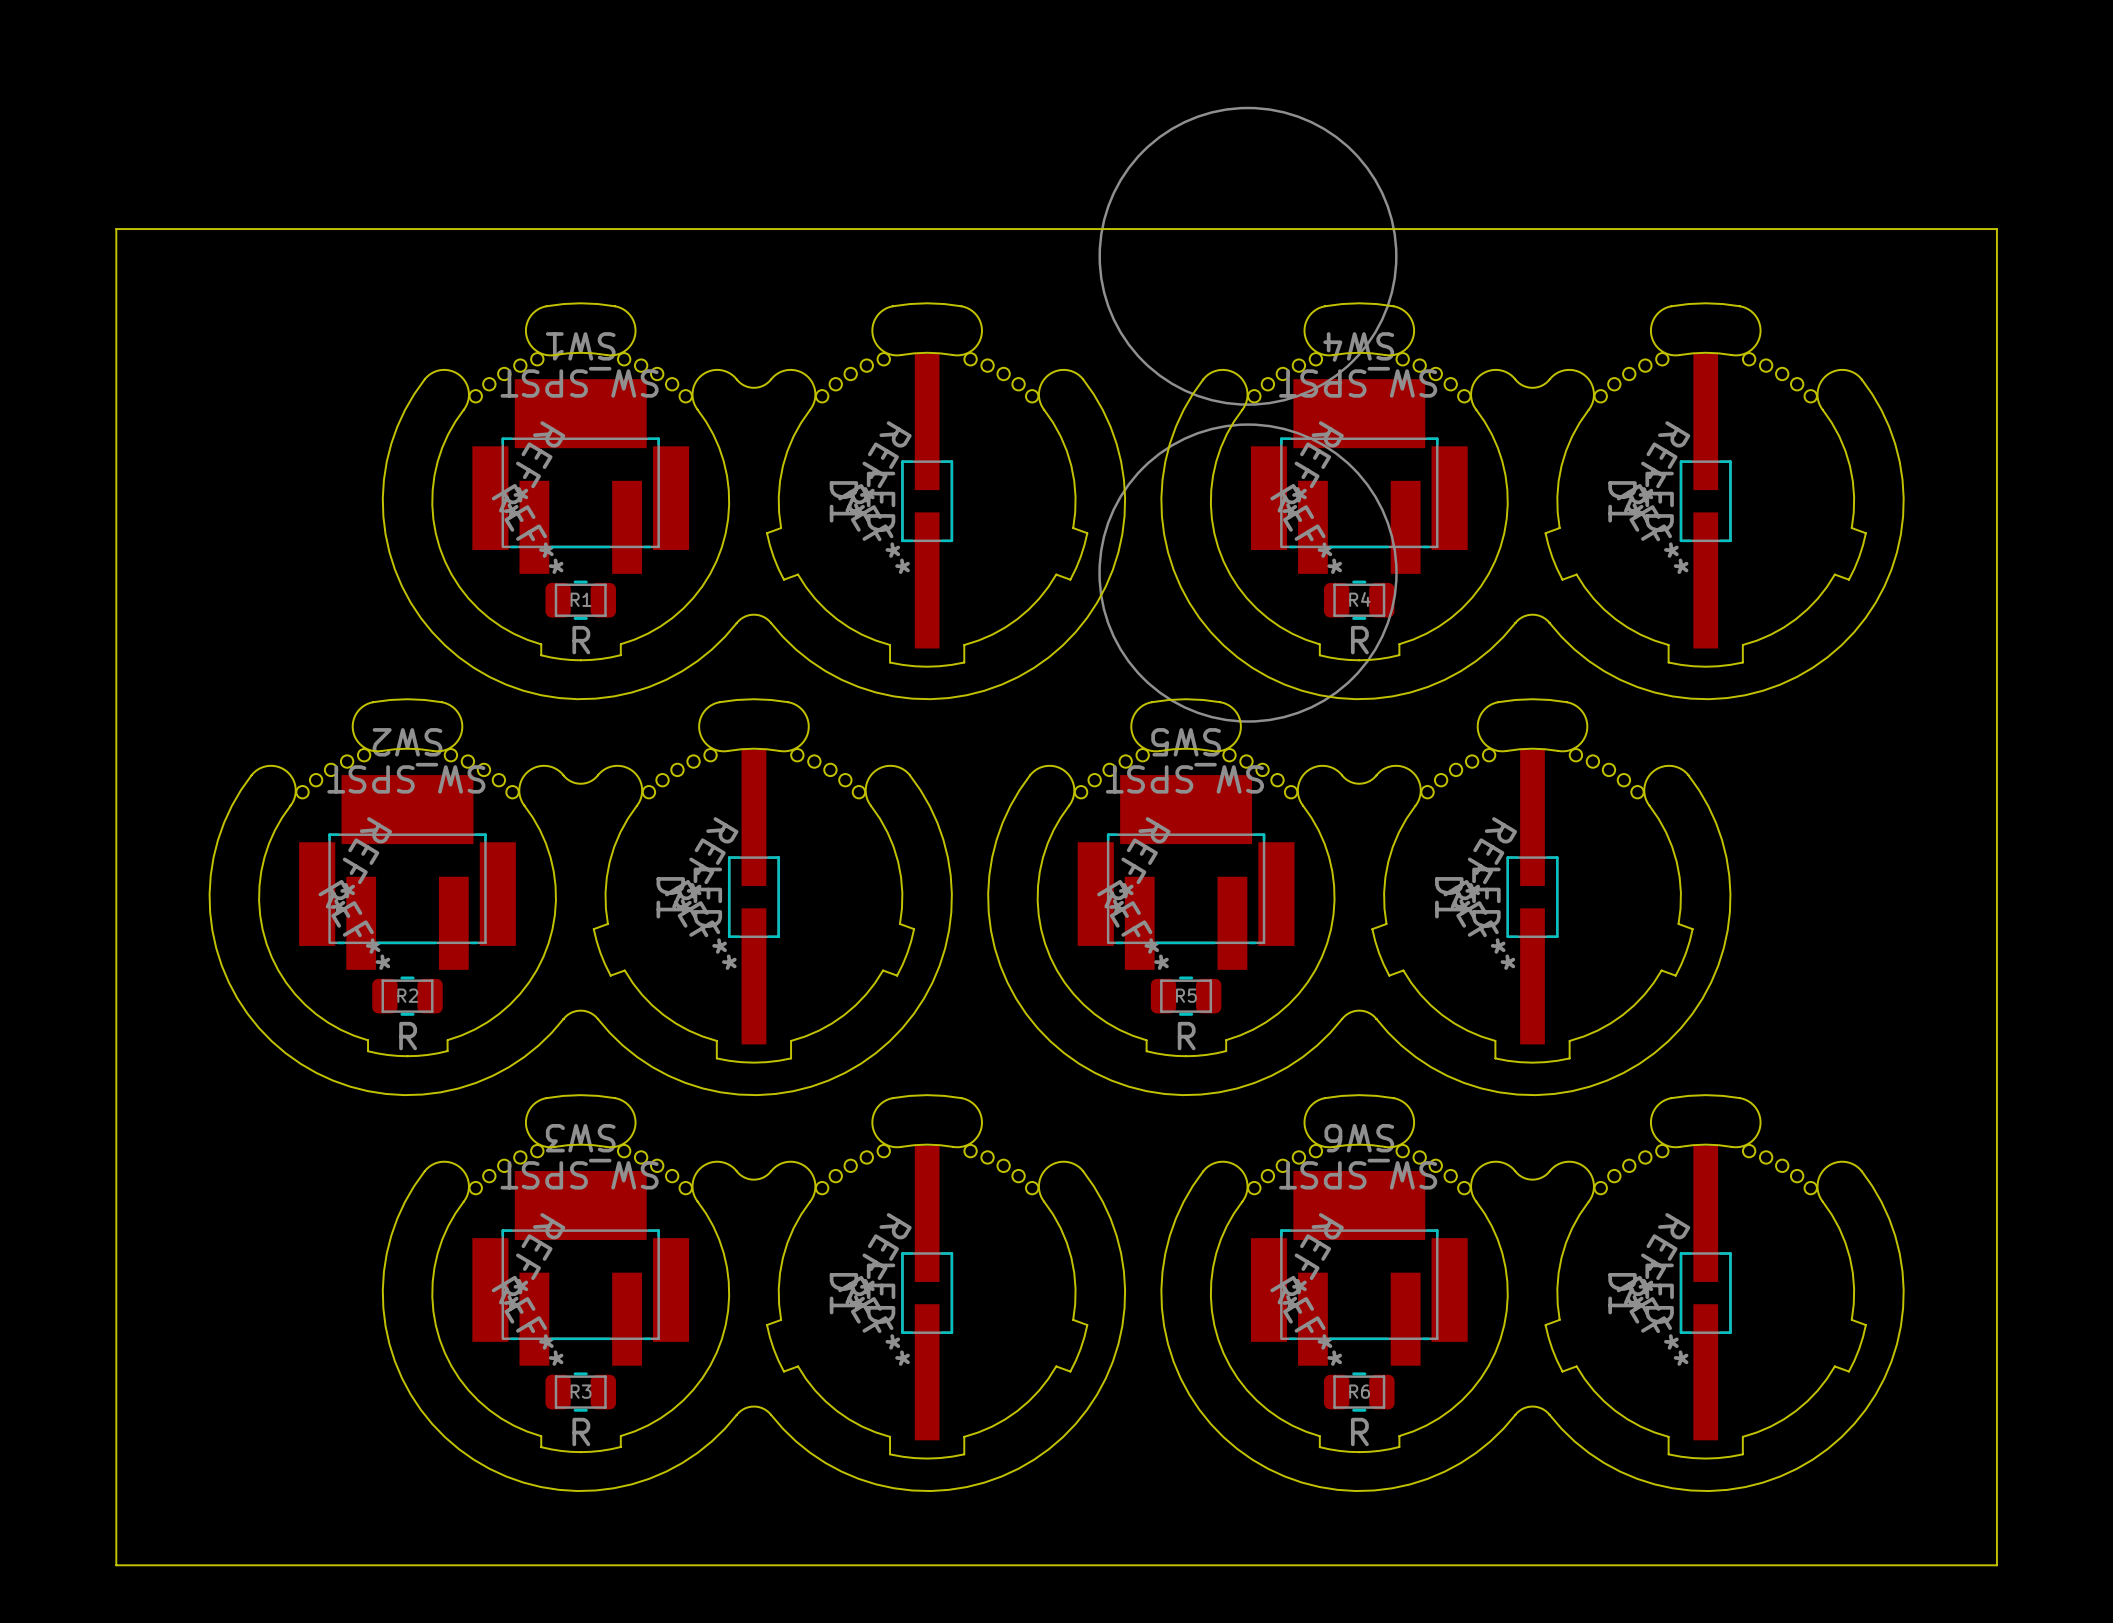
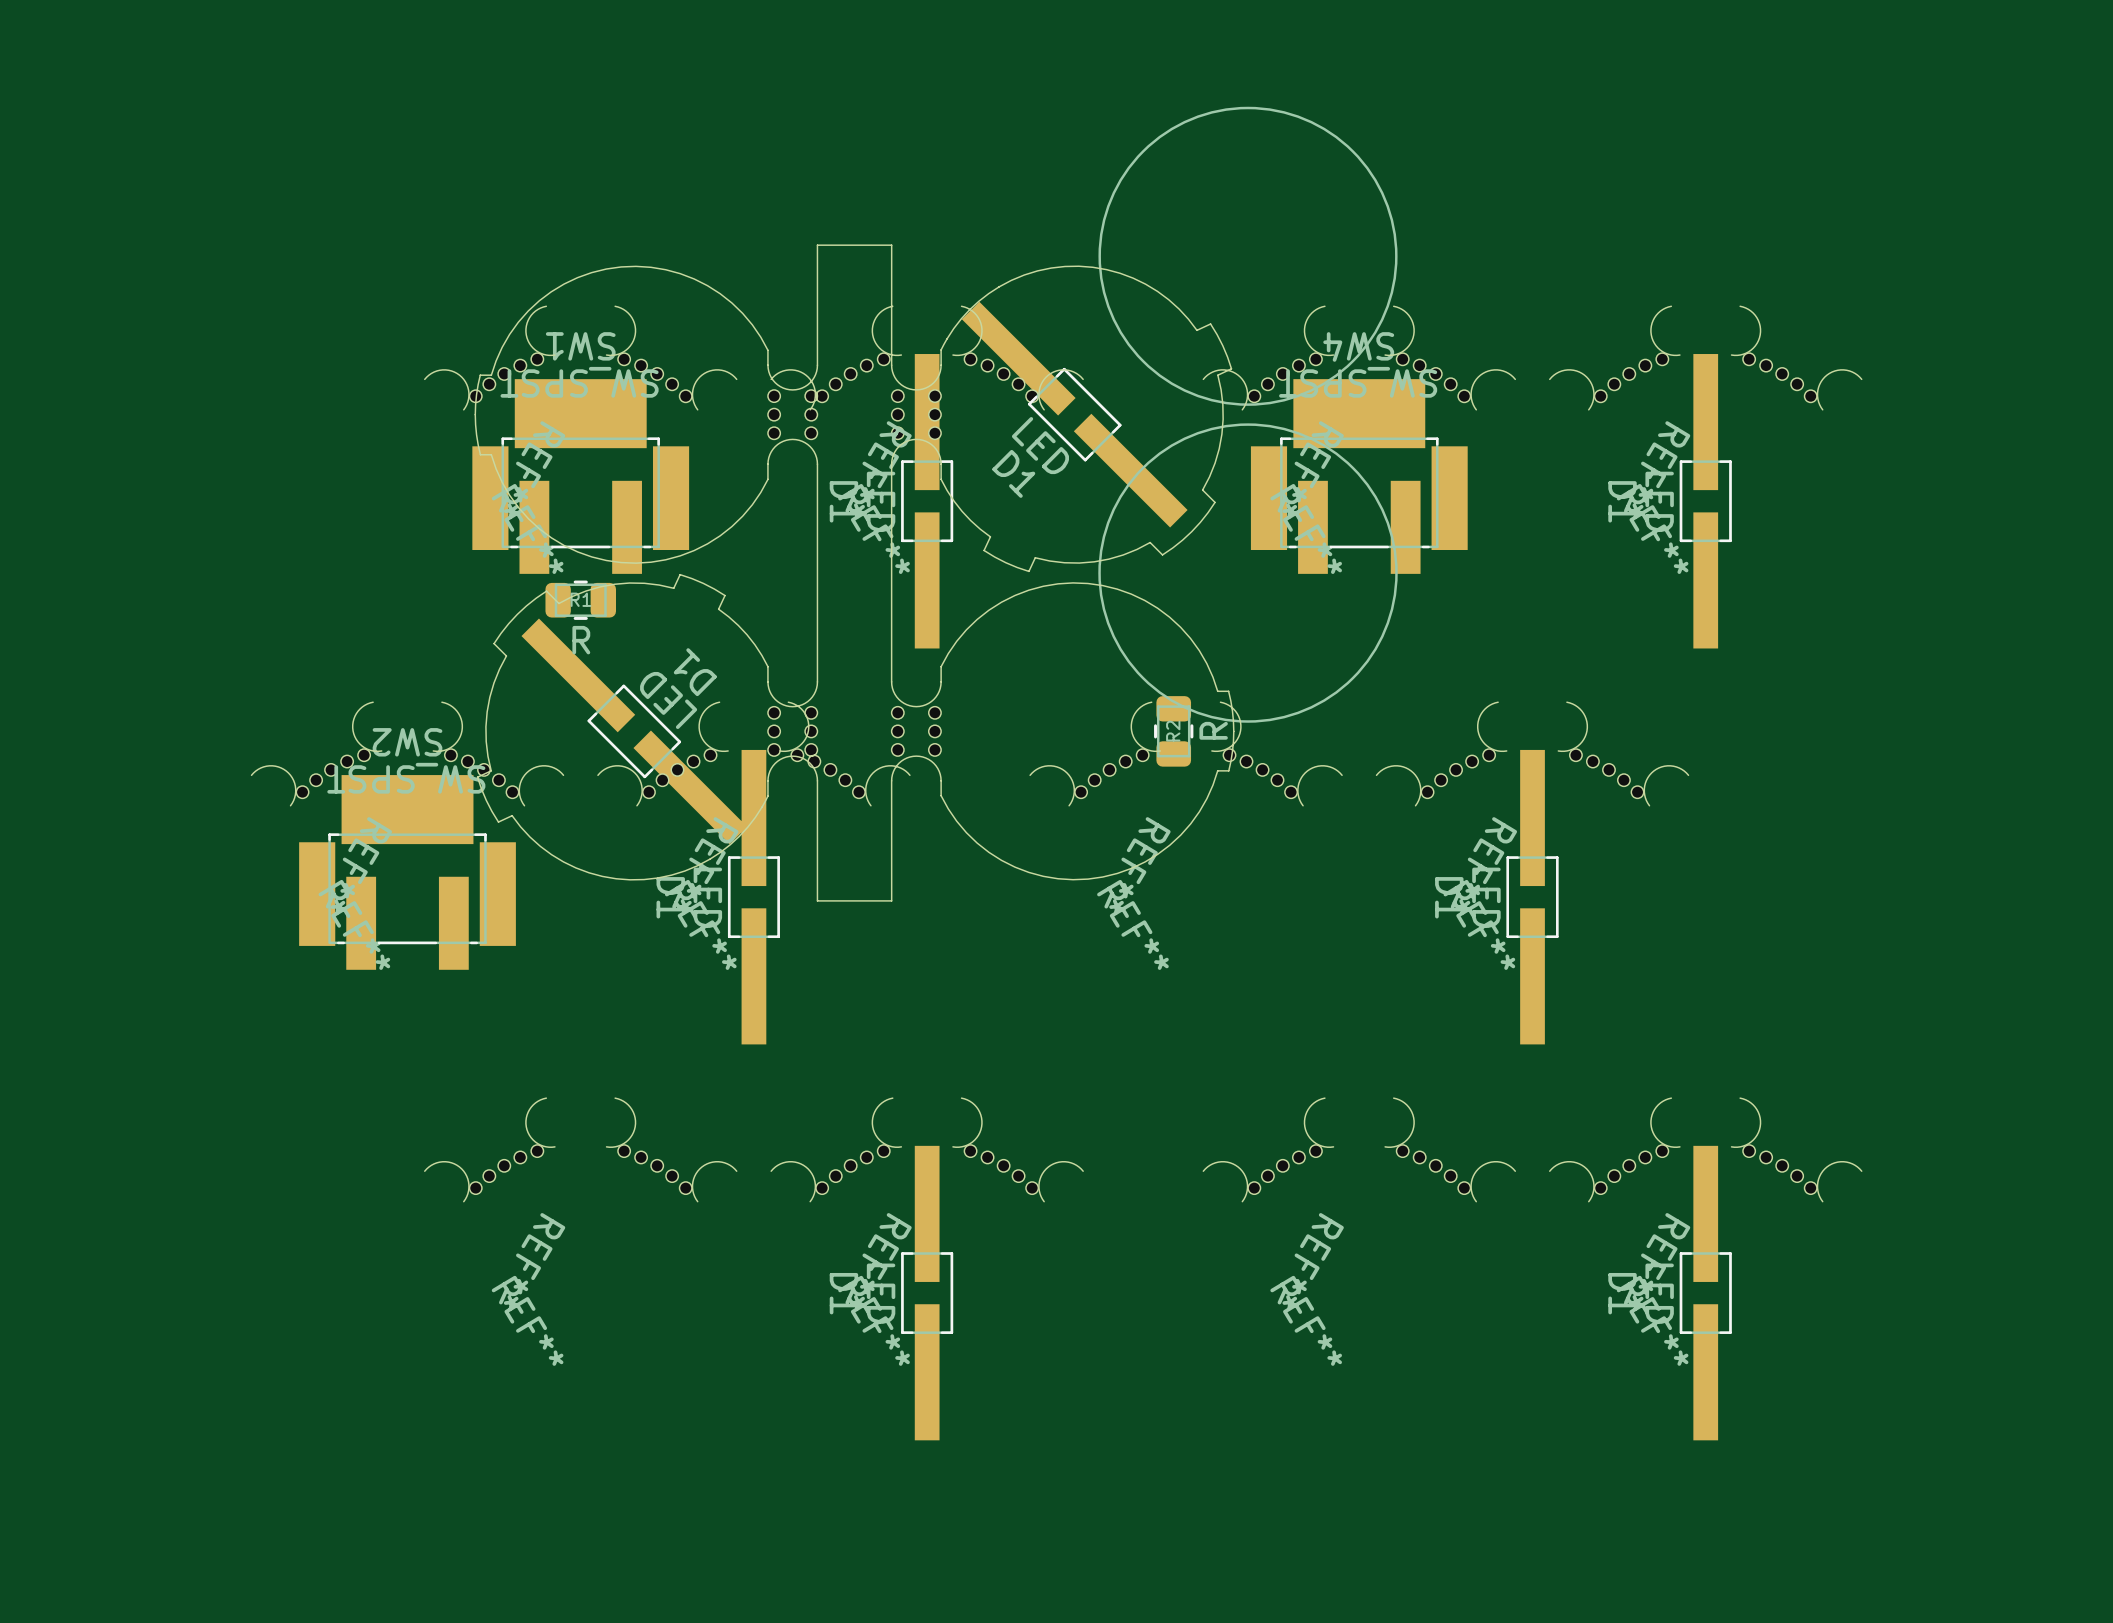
board edge: (116, 229) (1996, 229) (1996, 1565) (116, 1565) (116, 229) -> none
board edge: (546, 306) (580, 303) (615, 306) -> none
board edge: (892, 306) (927, 303) (961, 306) -> none
board edge: (1324, 306) (1359, 303) (1393, 306) -> none
board edge: (1671, 306) (1705, 303) (1740, 306) -> none
board edge: (554, 355) (580, 352) (606, 355) -> none
board edge: (901, 355) (927, 352) (952, 355) -> none
board edge: (1333, 355) (1359, 352) (1384, 355) -> none
board edge: (1680, 355) (1705, 352) (1731, 355) -> none
board edge: none -> (767, 365) (767, 350) (752, 324) (731, 302) (707, 285) (694, 278) (665, 269) (636, 266) (606, 269) (591, 272) (564, 284) (551, 291) (528, 310) (518, 322) (502, 347) (491, 375) (480, 375) (475, 414) (480, 454) (491, 454) (502, 482) (509, 495) (528, 518) (551, 537) (564, 545) (577, 551) (606, 560) (636, 563) (665, 559) (694, 550) (707, 543) (731, 526) (752, 504) (767, 479) (767, 464)
board edge: none -> (817, 365) (817, 245) (891, 245) (891, 365)
board edge: none -> (941, 365) (941, 349) (953, 328) (969, 309) (988, 293) (1011, 280) (1037, 270) (1078, 266) (1106, 269) (1145, 284) (1179, 309) (1196, 330) (1210, 323) (1222, 345) (1231, 368) (1217, 375) (1222, 404) (1221, 434) (1215, 463) (1202, 490) (1215, 502) (1191, 531) (1162, 554) (1150, 542) (1108, 559) (1079, 563) (1035, 557) (1028, 571) (1017, 567) (984, 550) (990, 536) (970, 520) (954, 501) (941, 479) (941, 464)
board edge: (424, 379) (405, 410) (391, 443) (386, 461) (382, 498) (385, 534) (395, 569) (410, 602) (420, 617) (445, 645) (473, 667) (506, 684) (541, 695) (577, 699) (613, 696) (649, 686) (682, 671) (711, 649) (740, 619) (748, 615) (756, 614) (767, 619) (783, 636) (810, 661) (841, 679) (858, 686) (893, 696) (930, 699) (966, 695) (984, 690) (1018, 677) (1034, 667) (1062, 645) (1075, 632) (1097, 602) (1105, 586) (1112, 569) (1122, 534) (1124, 516) (1123, 479) (1121, 461) (1110, 426) (1102, 410) (1083, 379) -> none
board edge: (736, 379) (745, 386) (753, 387) (762, 386) (771, 379) -> none
board edge: (1203, 379) (1183, 410) (1169, 443) (1162, 479) (1161, 516) (1164, 534) (1173, 569) (1189, 602) (1199, 617) (1223, 645) (1252, 667) (1284, 684) (1319, 695) (1356, 699) (1392, 696) (1427, 686) (1460, 671) (1490, 649) (1519, 619) (1526, 615) (1535, 614) (1545, 619) (1561, 636) (1588, 661) (1620, 679) (1637, 686) (1672, 696) (1708, 699) (1745, 695) (1762, 690) (1780, 684) (1812, 667) (1841, 645) (1854, 632) (1875, 602) (1884, 586) (1897, 552) (1900, 534) (1903, 516) (1902, 479) (1899, 461) (1889, 426) (1881, 410) (1861, 379) -> none
board edge: (1515, 379) (1521, 384) (1532, 387) (1543, 384) (1549, 379) -> none
board edge: (463, 409) (448, 434) (434, 475) (433, 519) (445, 561) (459, 586) (489, 618) (514, 633) (541, 644) (541, 655) (580, 660) (620, 655) (620, 644) (647, 633) (672, 618) (702, 586) (716, 561) (728, 519) (728, 490) (719, 447) (697, 409) -> none
board edge: (1044, 409) (1060, 436) (1071, 465) (1075, 496) (1073, 528) (1087, 533) (1075, 568) (1070, 579) (1056, 574) (1039, 598) (1005, 627) (964, 645) (964, 662) (927, 666) (890, 662) (890, 645) (849, 627) (825, 609) (798, 574) (783, 579) (778, 568) (767, 533) (781, 528) (778, 496) (782, 465) (793, 436) (810, 410) -> none
board edge: (1242, 409) (1220, 447) (1211, 490) (1214, 533) (1223, 561) (1237, 586) (1268, 618) (1292, 633) (1319, 644) (1319, 655) (1359, 660) (1399, 655) (1399, 644) (1426, 633) (1451, 618) (1472, 597) (1495, 561) (1504, 533) (1507, 490) (1497, 447) (1476, 409) -> none
board edge: (1822, 409) (1839, 436) (1849, 465) (1854, 496) (1851, 528) (1865, 533) (1854, 568) (1848, 579) (1834, 574) (1807, 609) (1783, 627) (1742, 645) (1742, 662) (1705, 666) (1668, 662) (1668, 645) (1627, 627) (1604, 609) (1576, 574) (1562, 579) (1556, 568) (1545, 533) (1559, 528) (1557, 496) (1561, 465) (1572, 436) (1588, 410) -> none
part: none -> (792, 414)
part: none -> (916, 414)
D1: none -> LED (1074, 414)
board edge: none -> (817, 464) (817, 681)
board edge: none -> (891, 464) (891, 681)
R4: R (1359, 600) -> none
board edge: none -> (767, 681) (767, 666) (754, 644) (738, 625) (718, 609) (724, 595) (691, 578) (680, 574) (673, 588) (629, 583) (600, 586) (558, 603) (546, 591) (517, 614) (494, 643) (506, 656) (493, 682) (487, 711) (486, 741) (491, 770) (477, 777) (486, 800) (498, 822) (512, 815) (540, 846) (563, 861) (602, 876) (630, 879) (671, 875) (697, 865) (720, 852) (739, 836) (755, 817) (767, 796) (767, 780)
board edge: none -> (941, 681) (941, 666) (956, 641) (977, 619) (1001, 602) (1028, 590) (1058, 583) (1087, 583) (1102, 585) (1117, 589) (1144, 600) (1169, 617) (1180, 627) (1190, 638) (1206, 663) (1217, 691) (1228, 691) (1233, 731) (1228, 770) (1217, 770) (1206, 798) (1190, 823) (1180, 835) (1157, 854) (1145, 861) (1117, 873) (1102, 877) (1073, 879) (1043, 876) (1028, 872) (1001, 860) (977, 843) (956, 821) (941, 795) (941, 780)
board edge: (373, 702) (407, 699) (441, 702) -> none
board edge: (719, 702) (753, 699) (788, 702) -> none
board edge: (1151, 702) (1186, 699) (1220, 702) -> none
board edge: (1498, 702) (1532, 699) (1566, 702) -> none
D1: none -> LED (634, 731)
part: none -> (792, 731)
part: none -> (916, 731)
board edge: (381, 750) (407, 748) (433, 750) -> none
board edge: (728, 750) (753, 748) (779, 750) -> none
board edge: (1160, 750) (1186, 748) (1211, 750) -> none
board edge: (1506, 750) (1532, 748) (1558, 750) -> none
board edge: (251, 775) (231, 806) (218, 839) (210, 875) (210, 912) (212, 930) (221, 965) (228, 982) (247, 1013) (271, 1041) (300, 1063) (333, 1080) (367, 1091) (404, 1095) (440, 1092) (476, 1082) (509, 1067) (538, 1045) (567, 1015) (575, 1011) (583, 1010) (593, 1015) (609, 1032) (637, 1057) (668, 1075) (702, 1088) (738, 1094) (757, 1095) (775, 1093) (811, 1086) (845, 1072) (860, 1063) (889, 1041) (902, 1028) (913, 1013) (932, 982) (939, 965) (949, 930) (951, 893) (950, 875) (943, 839) (937, 822) (920, 790) (909, 775) -> none
board edge: (563, 775) (572, 782) (580, 783) (591, 780) (597, 775) -> none
board edge: (1030, 775) (1010, 806) (996, 839) (992, 857) (988, 893) (990, 930) (1000, 965) (1007, 982) (1026, 1013) (1050, 1041) (1079, 1063) (1111, 1080) (1146, 1091) (1182, 1095) (1219, 1092) (1254, 1082) (1287, 1067) (1317, 1045) (1346, 1015) (1353, 1011) (1362, 1010) (1372, 1015) (1388, 1032) (1415, 1057) (1447, 1075) (1481, 1088) (1517, 1094) (1535, 1095) (1572, 1091) (1589, 1086) (1607, 1080) (1639, 1063) (1668, 1041) (1680, 1028) (1692, 1013) (1711, 982) (1723, 948) (1727, 930) (1729, 912) (1729, 875) (1722, 839) (1715, 822) (1708, 806) (1688, 775) -> none
board edge: (1342, 775) (1350, 782) (1359, 783) (1370, 780) (1376, 775) -> none
board edge: none -> (817, 780) (817, 900) (891, 900) (891, 780)
board edge: (290, 805) (269, 843) (261, 871) (260, 915) (271, 957) (295, 994) (316, 1014) (340, 1029) (368, 1040) (368, 1051) (407, 1056) (447, 1051) (447, 1040) (474, 1029) (499, 1013) (529, 982) (543, 957) (554, 915) (553, 871) (540, 830) (524, 805) -> none
board edge: (636, 805) (620, 832) (609, 861) (605, 892) (607, 923) (593, 929) (605, 964) (610, 975) (624, 970) (652, 1005) (675, 1023) (716, 1040) (716, 1058) (753, 1062) (791, 1058) (791, 1040) (831, 1023) (865, 994) (883, 970) (897, 975) (902, 964) (914, 929) (899, 923) (902, 892) (898, 861) (887, 832) (870, 805) -> none
board edge: (1069, 805) (1053, 830) (1039, 871) (1038, 915) (1050, 957) (1073, 994) (1094, 1014) (1119, 1029) (1146, 1040) (1146, 1051) (1186, 1056) (1226, 1051) (1226, 1040) (1253, 1029) (1277, 1013) (1298, 993) (1321, 957) (1331, 929) (1334, 885) (1324, 843) (1302, 805) -> none
board edge: (1415, 805) (1398, 832) (1388, 861) (1384, 892) (1386, 923) (1372, 929) (1383, 964) (1389, 975) (1403, 970) (1420, 994) (1454, 1023) (1495, 1040) (1495, 1058) (1532, 1062) (1569, 1058) (1569, 1040) (1610, 1023) (1644, 994) (1661, 970) (1675, 975) (1681, 964) (1692, 929) (1678, 923) (1680, 892) (1676, 861) (1666, 832) (1649, 805) -> none
SW5: SW_SPST (1186, 872) -> none
R2 rotation: 0° (407, 996) -> 90° clockwise (1173, 731)
R2 position: (407, 996) -> (1173, 731)
R5: R (1186, 996) -> none
R2 value position: R (408, 1036) -> R (1213, 730)
board edge: (546, 1098) (580, 1095) (615, 1098) -> none
board edge: (892, 1098) (927, 1095) (961, 1098) -> none
board edge: (1324, 1098) (1359, 1095) (1393, 1098) -> none
board edge: (1671, 1098) (1705, 1095) (1740, 1098) -> none
board edge: (554, 1146) (580, 1144) (606, 1146) -> none
board edge: (901, 1146) (927, 1144) (952, 1146) -> none
board edge: (1333, 1146) (1359, 1144) (1384, 1146) -> none
board edge: (1680, 1146) (1705, 1144) (1731, 1146) -> none
board edge: (424, 1171) (405, 1201) (391, 1235) (386, 1253) (382, 1289) (385, 1326) (395, 1361) (410, 1394) (432, 1424) (458, 1449) (473, 1459) (506, 1476) (541, 1487) (577, 1491) (613, 1488) (649, 1478) (682, 1463) (711, 1441) (740, 1410) (748, 1407) (756, 1406) (767, 1410) (783, 1428) (810, 1452) (841, 1471) (876, 1484) (893, 1488) (930, 1491) (948, 1489) (984, 1482) (1018, 1468) (1034, 1459) (1062, 1437) (1075, 1424) (1087, 1409) (1105, 1378) (1112, 1361) (1122, 1326) (1124, 1308) (1123, 1271) (1121, 1253) (1110, 1218) (1093, 1186) (1083, 1171) -> none
board edge: (736, 1171) (743, 1176) (753, 1179) (764, 1176) (771, 1171) -> none
board edge: (1203, 1171) (1183, 1201) (1169, 1235) (1165, 1253) (1161, 1289) (1164, 1326) (1173, 1361) (1189, 1394) (1199, 1409) (1223, 1437) (1252, 1459) (1284, 1476) (1319, 1487) (1356, 1491) (1392, 1488) (1427, 1478) (1460, 1463) (1490, 1441) (1519, 1410) (1526, 1407) (1535, 1406) (1545, 1410) (1561, 1428) (1588, 1452) (1620, 1471) (1654, 1484) (1690, 1490) (1708, 1491) (1745, 1487) (1762, 1482) (1796, 1468) (1812, 1459) (1827, 1449) (1854, 1424) (1875, 1394) (1884, 1378) (1897, 1344) (1900, 1326) (1903, 1308) (1902, 1271) (1895, 1235) (1889, 1218) (1881, 1201) (1861, 1171) -> none
board edge: (1515, 1171) (1521, 1176) (1532, 1179) (1540, 1178) (1549, 1171) -> none
board edge: (463, 1201) (448, 1226) (434, 1267) (433, 1311) (445, 1353) (468, 1390) (489, 1410) (514, 1425) (541, 1436) (541, 1447) (580, 1452) (620, 1447) (620, 1436) (647, 1425) (672, 1409) (693, 1389) (716, 1352) (725, 1325) (728, 1281) (719, 1239) (697, 1201) -> none
board edge: (1044, 1201) (1060, 1228) (1071, 1257) (1075, 1288) (1073, 1319) (1087, 1325) (1075, 1360) (1070, 1371) (1056, 1366) (1039, 1390) (1005, 1419) (964, 1436) (964, 1454) (927, 1458) (890, 1454) (890, 1436) (849, 1419) (825, 1401) (798, 1366) (783, 1371) (778, 1360) (767, 1325) (781, 1319) (778, 1288) (782, 1257) (793, 1228) (810, 1201) -> none
board edge: (1242, 1201) (1220, 1239) (1211, 1282) (1214, 1325) (1223, 1353) (1237, 1378) (1268, 1410) (1292, 1425) (1319, 1436) (1319, 1447) (1359, 1452) (1399, 1447) (1399, 1436) (1426, 1425) (1451, 1409) (1472, 1389) (1495, 1352) (1506, 1310) (1507, 1281) (1497, 1239) (1476, 1201) -> none
board edge: (1822, 1201) (1839, 1228) (1849, 1257) (1854, 1288) (1851, 1319) (1865, 1325) (1854, 1360) (1848, 1371) (1834, 1366) (1817, 1390) (1783, 1419) (1742, 1436) (1742, 1454) (1705, 1458) (1668, 1454) (1668, 1436) (1627, 1419) (1593, 1390) (1576, 1366) (1562, 1371) (1556, 1360) (1545, 1325) (1559, 1319) (1557, 1288) (1561, 1257) (1572, 1228) (1588, 1201) -> none
SW3: SW_SPST (580, 1268) -> none
SW6: SW_SPST (1359, 1268) -> none
R3: R (580, 1392) -> none
R6: R (1359, 1392) -> none

